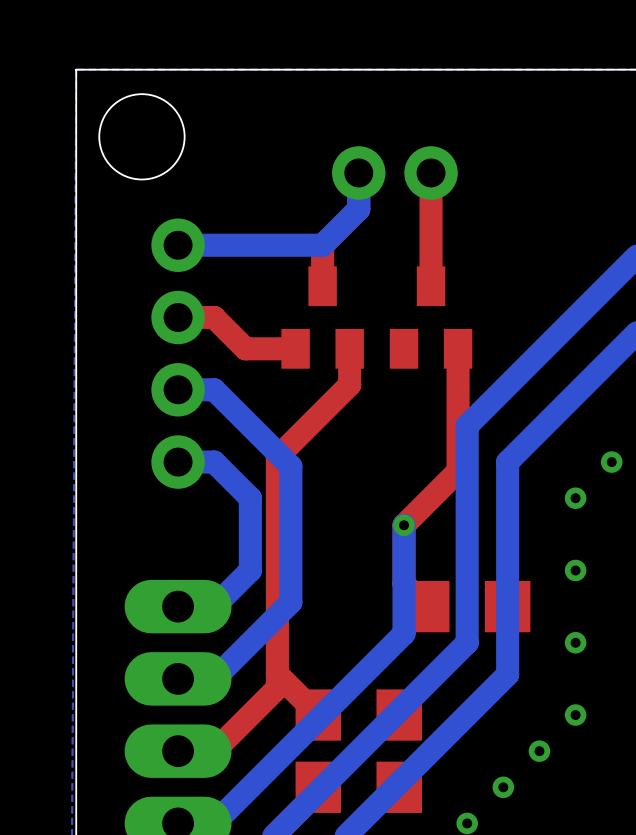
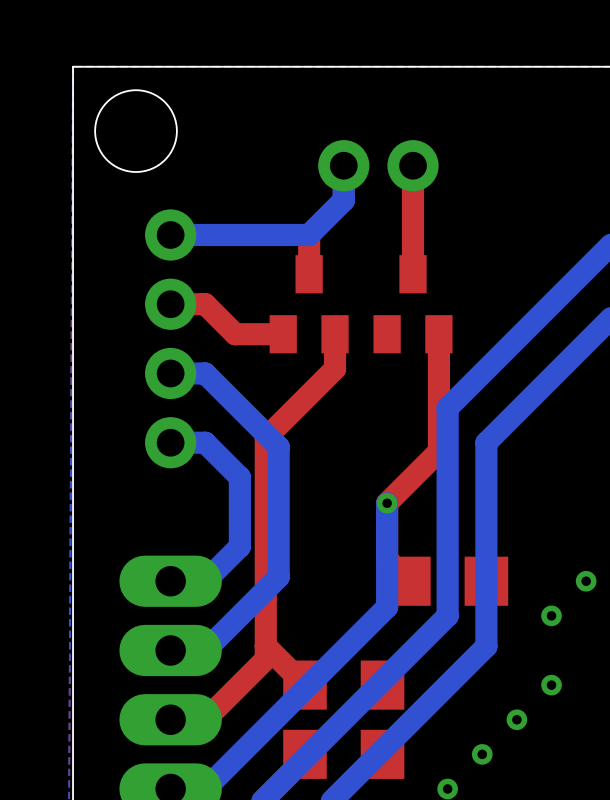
via: (611, 462) -> none
via: (575, 498) -> none
via: (575, 570) -> none
via: none -> (586, 581)

